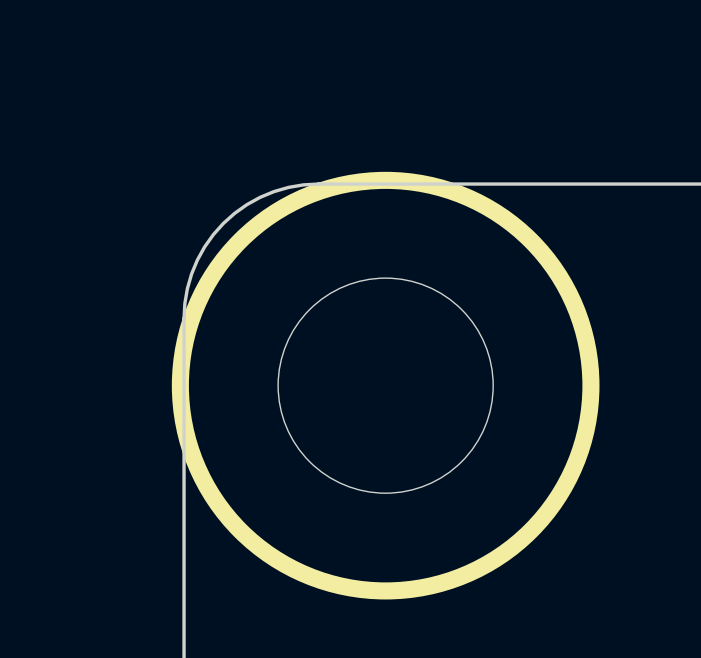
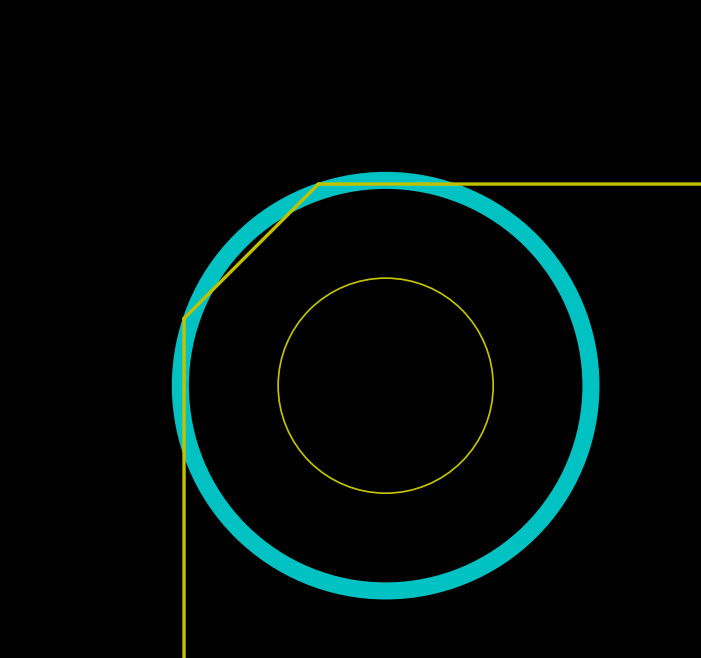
board edge: (318, 184) (288, 187) (260, 197) (234, 213) (223, 223) (204, 246) (197, 260) (187, 288) (184, 318) -> (318, 184) (184, 318)

